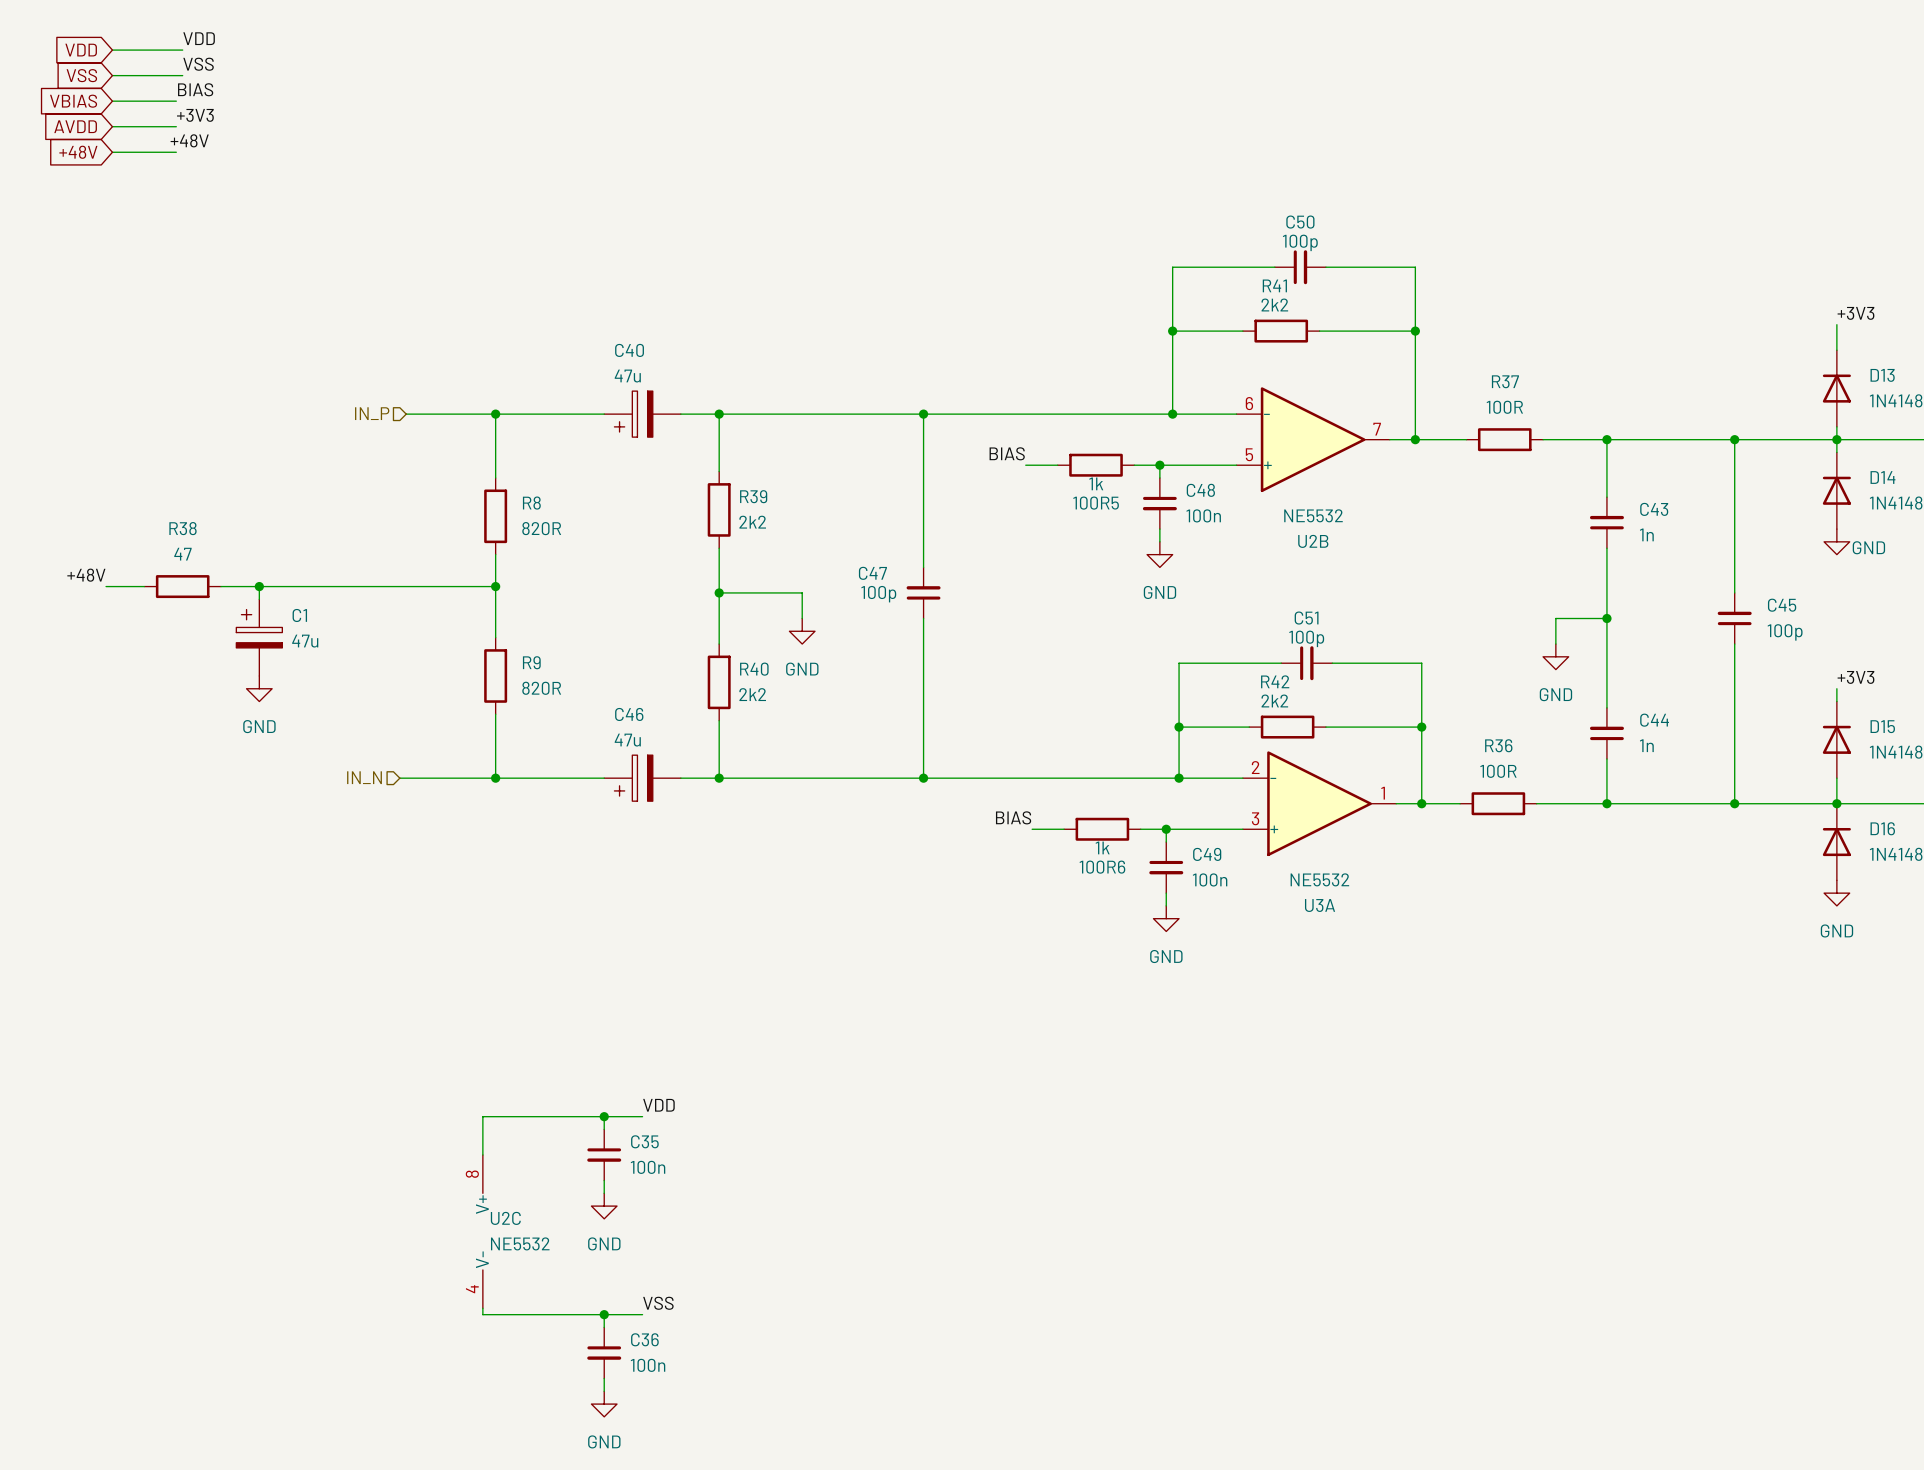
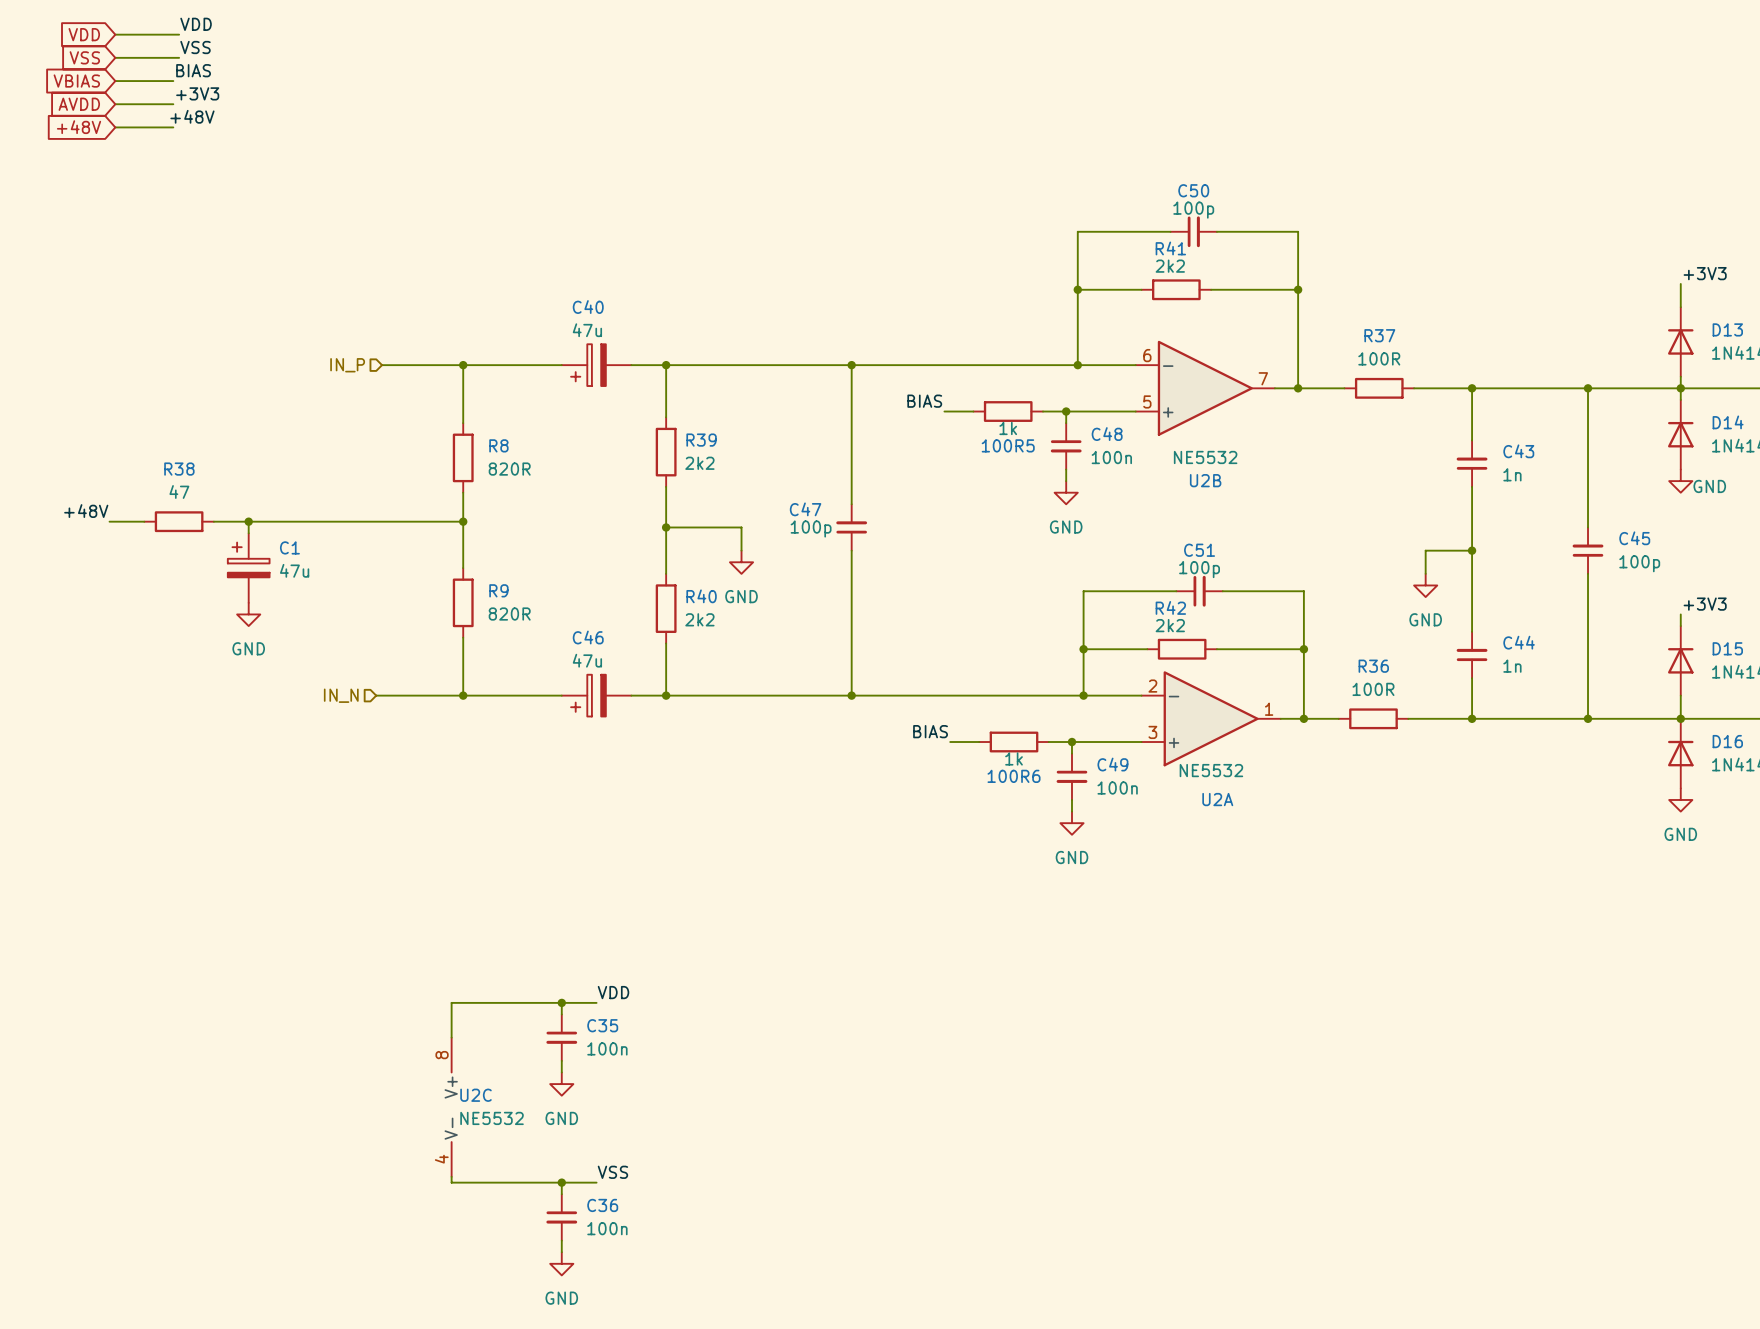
U3A value position: NE5532 (1319, 879) -> NE5532 (1211, 770)
U3A name: U3A (1320, 905) -> U2A (1217, 799)

